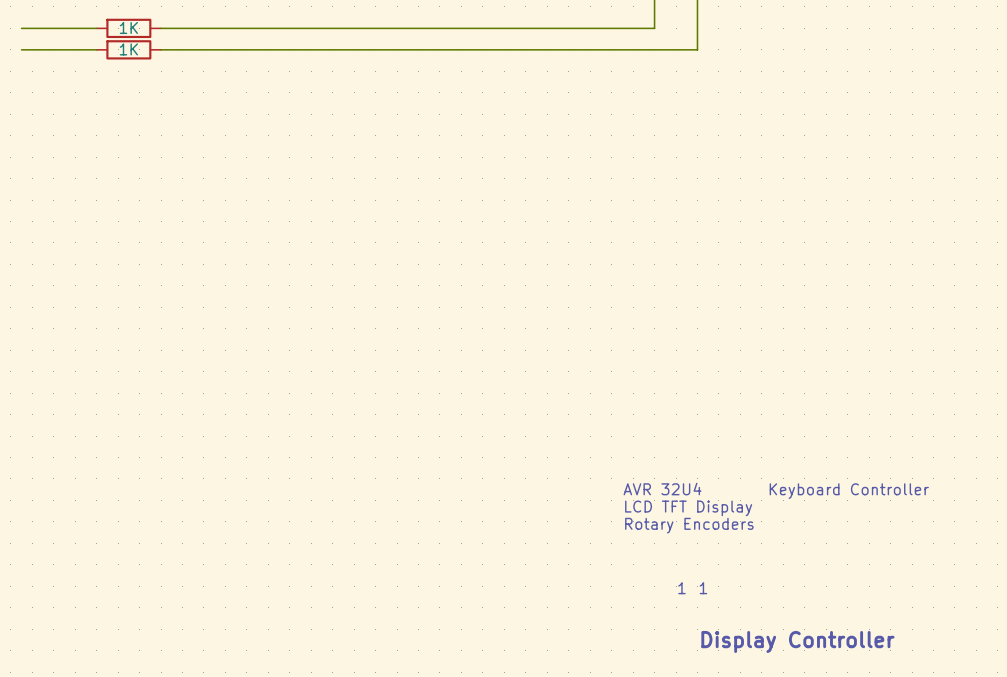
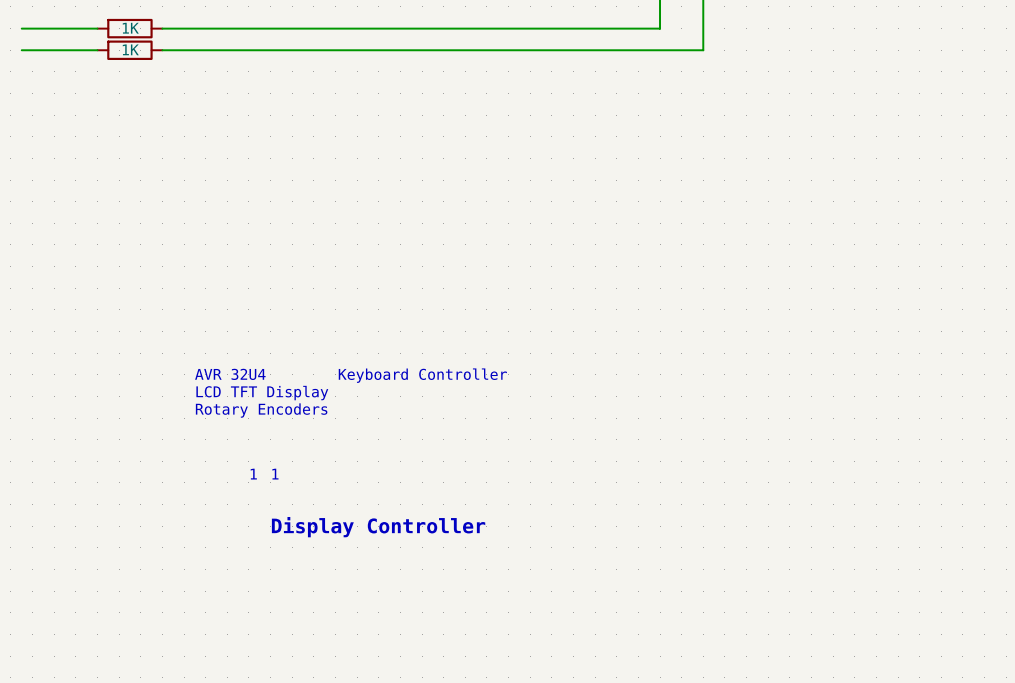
text: none -> AVR 32U4 Keyboard Controller (351, 375)
text: none -> LCD TFT Display (262, 393)
text: none -> Rotary Encoders (261, 410)
text: none -> 1 (253, 474)
text: none -> 1 (275, 474)
text: AVR 32U4 Keyboard Controller (776, 490) -> none
text: LCD TFT Display (688, 508) -> none
text: none -> Display Controller (378, 527)
text: Rotary Encoders (689, 525) -> none
text: 1 (681, 588) -> none
text: 1 (703, 588) -> none
text: Display Controller (797, 641) -> none

